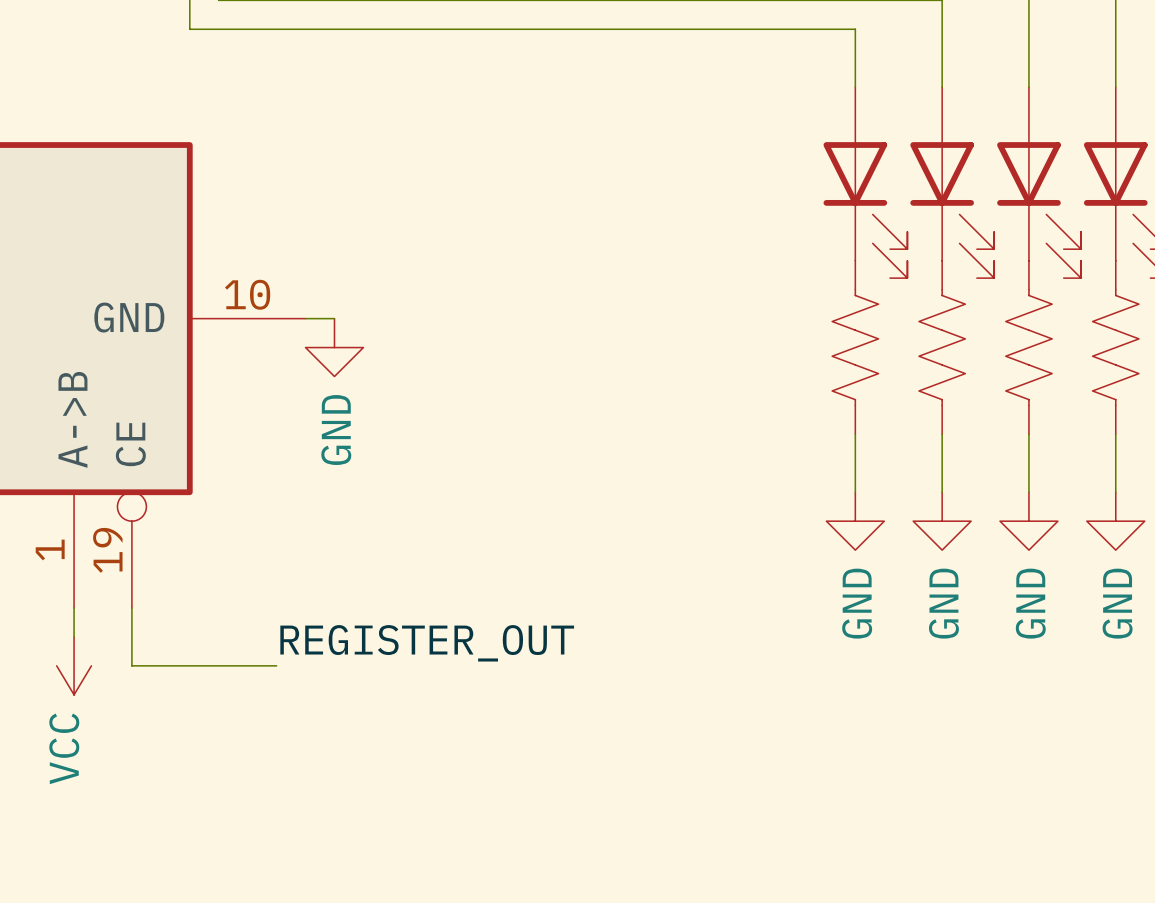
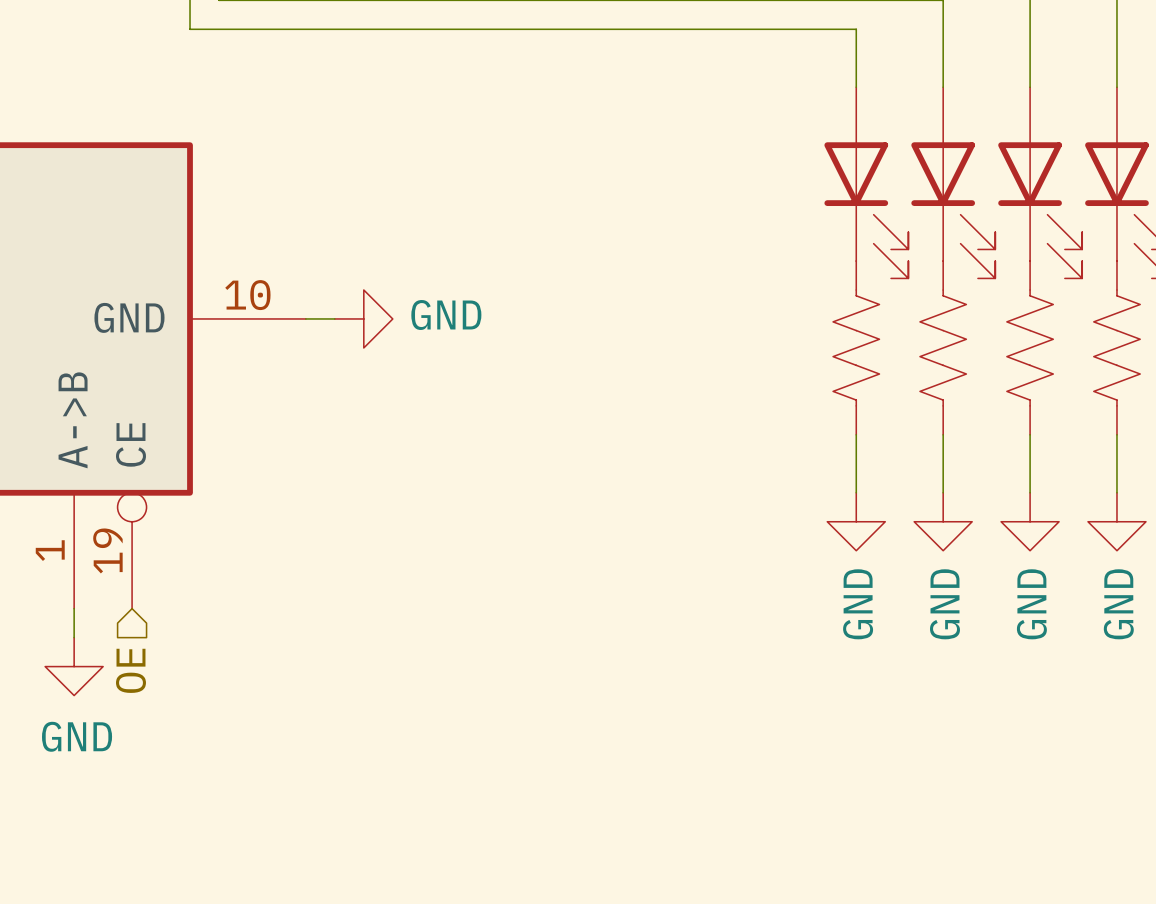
power symbol rotation: 0° (334, 347) -> 90° counterclockwise (363, 318)
power symbol position: GND (334, 347) -> GND (363, 318)
wire: (131, 607) (131, 665) (276, 665) -> none
label: REGISTER_OUT (427, 643) -> none
power symbol: VCC (74, 665) -> GND (74, 666)
hierarchical label: none -> OE (130, 670)

